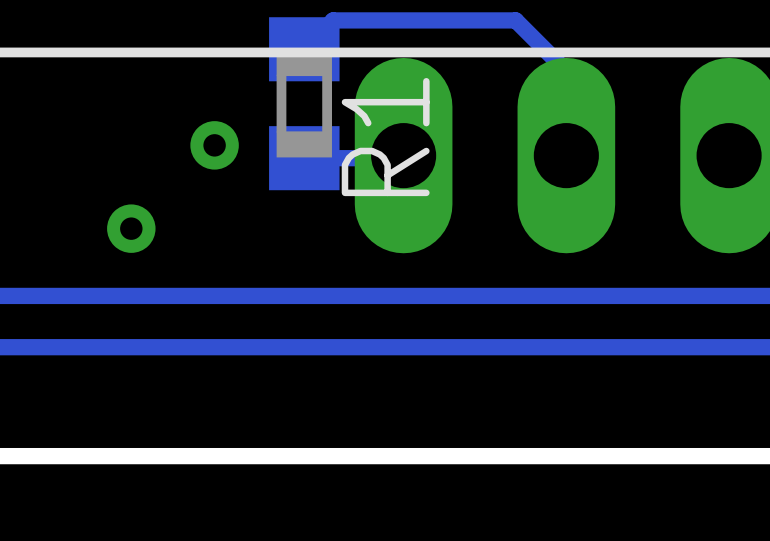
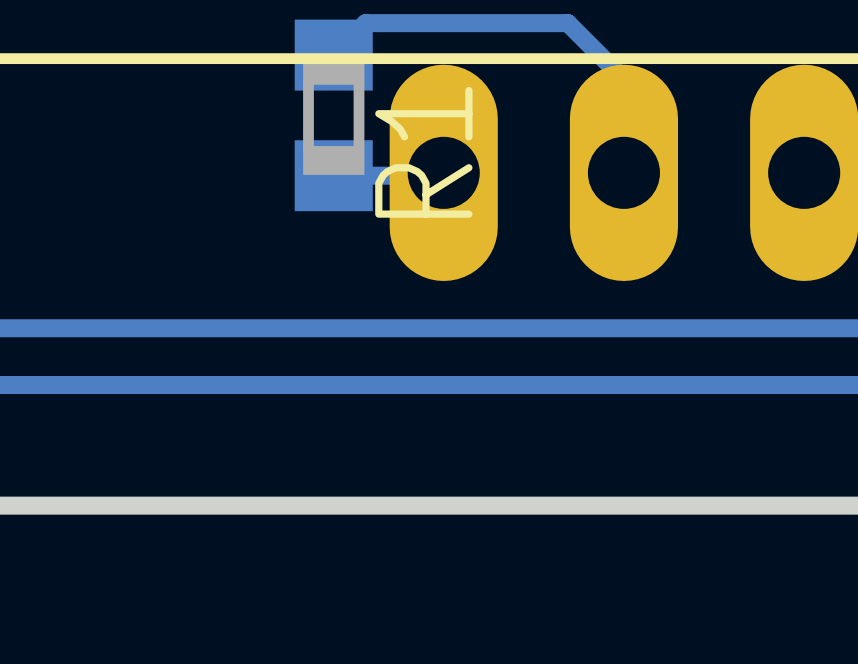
via: (214, 145) -> none
via: (131, 228) -> none

